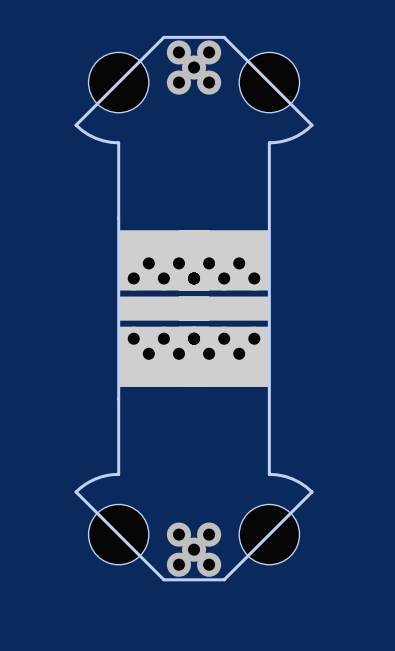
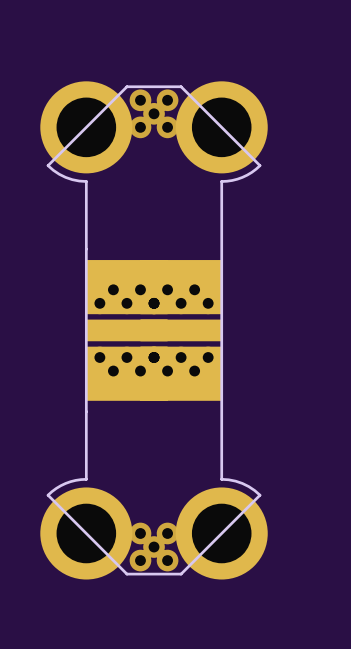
part footprint: [88, 52, 149, 113] -> [40, 81, 133, 174]
part footprint: [239, 52, 300, 113] -> [175, 81, 268, 174]
part footprint: [88, 504, 149, 565] -> [40, 487, 133, 580]
part footprint: [239, 504, 300, 565] -> [175, 487, 268, 580]

